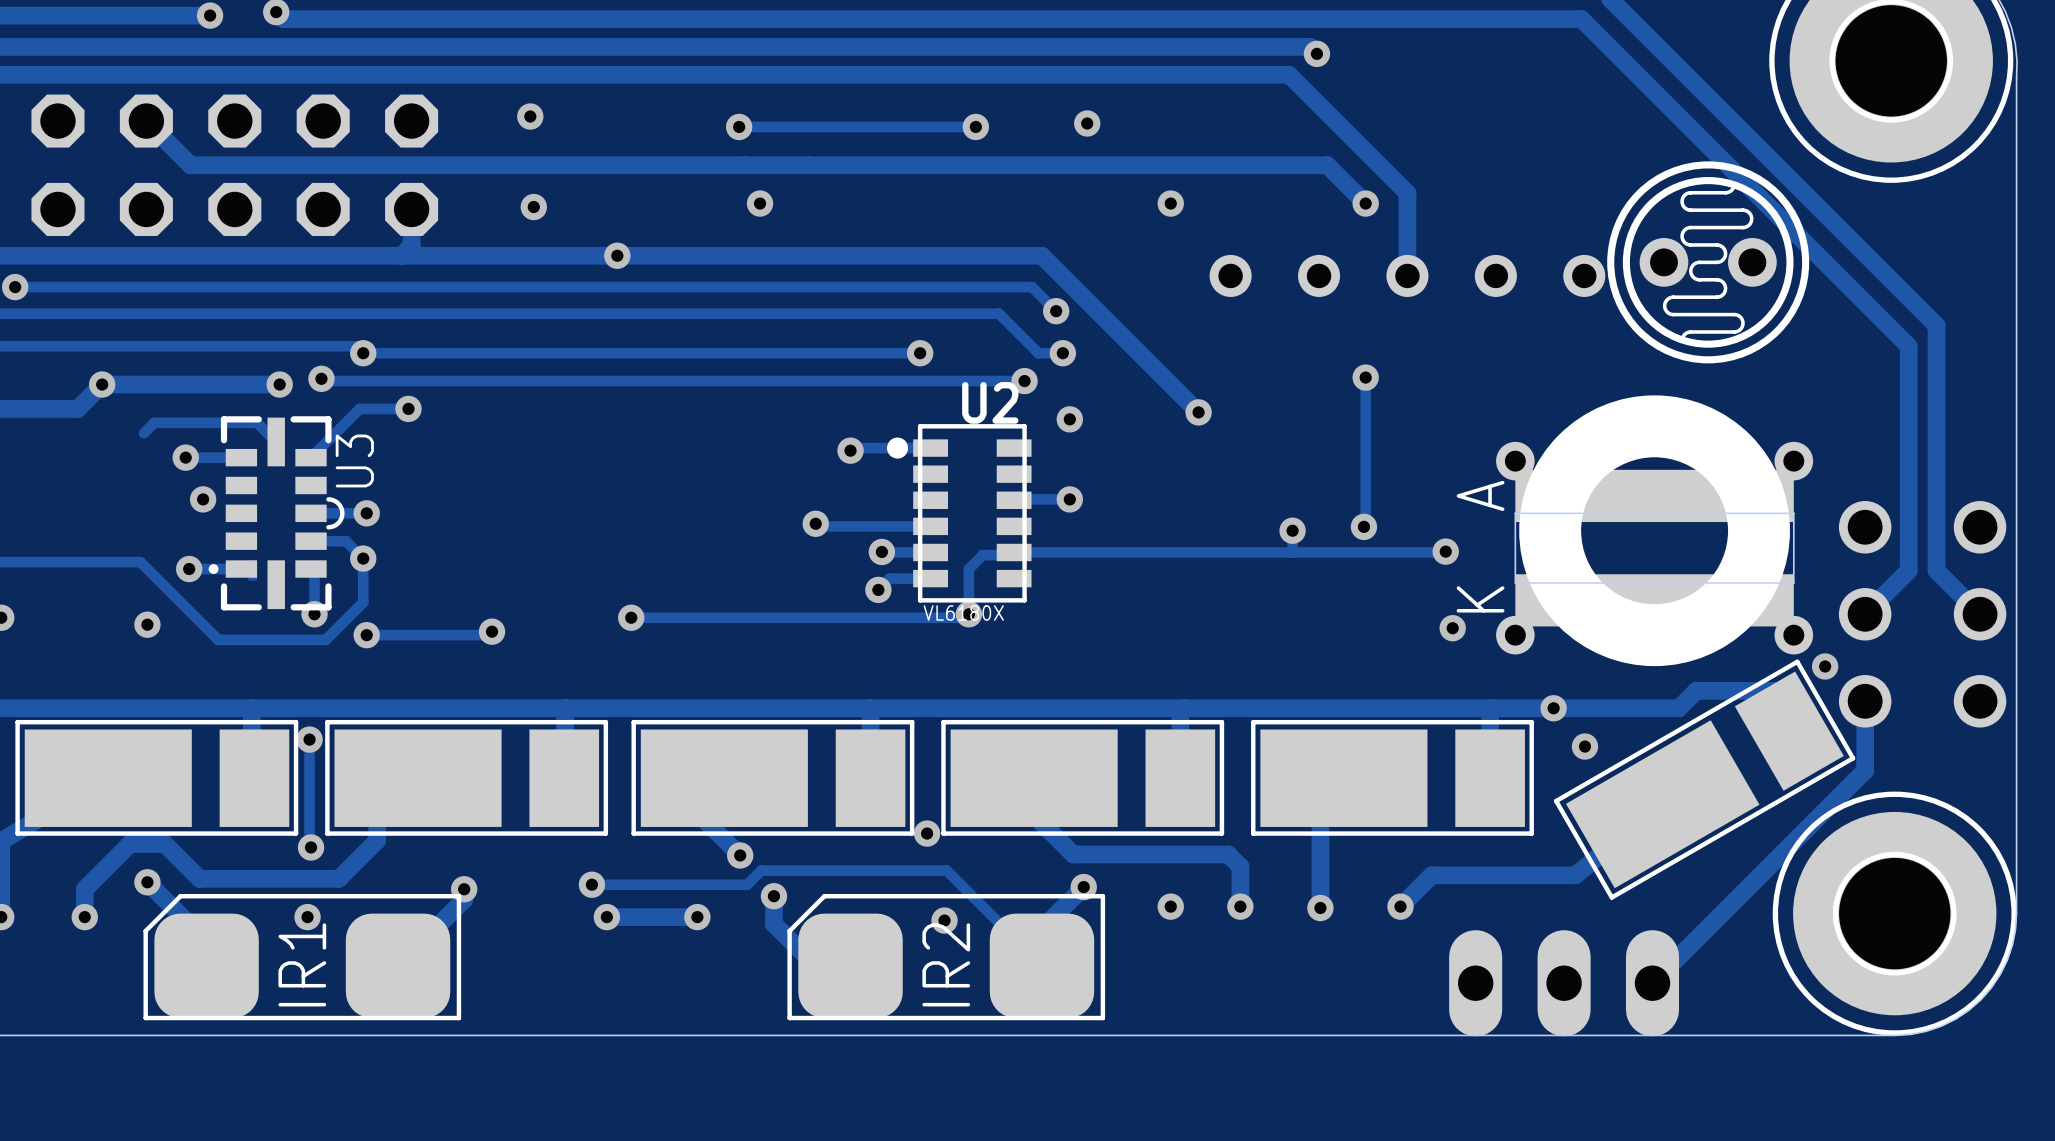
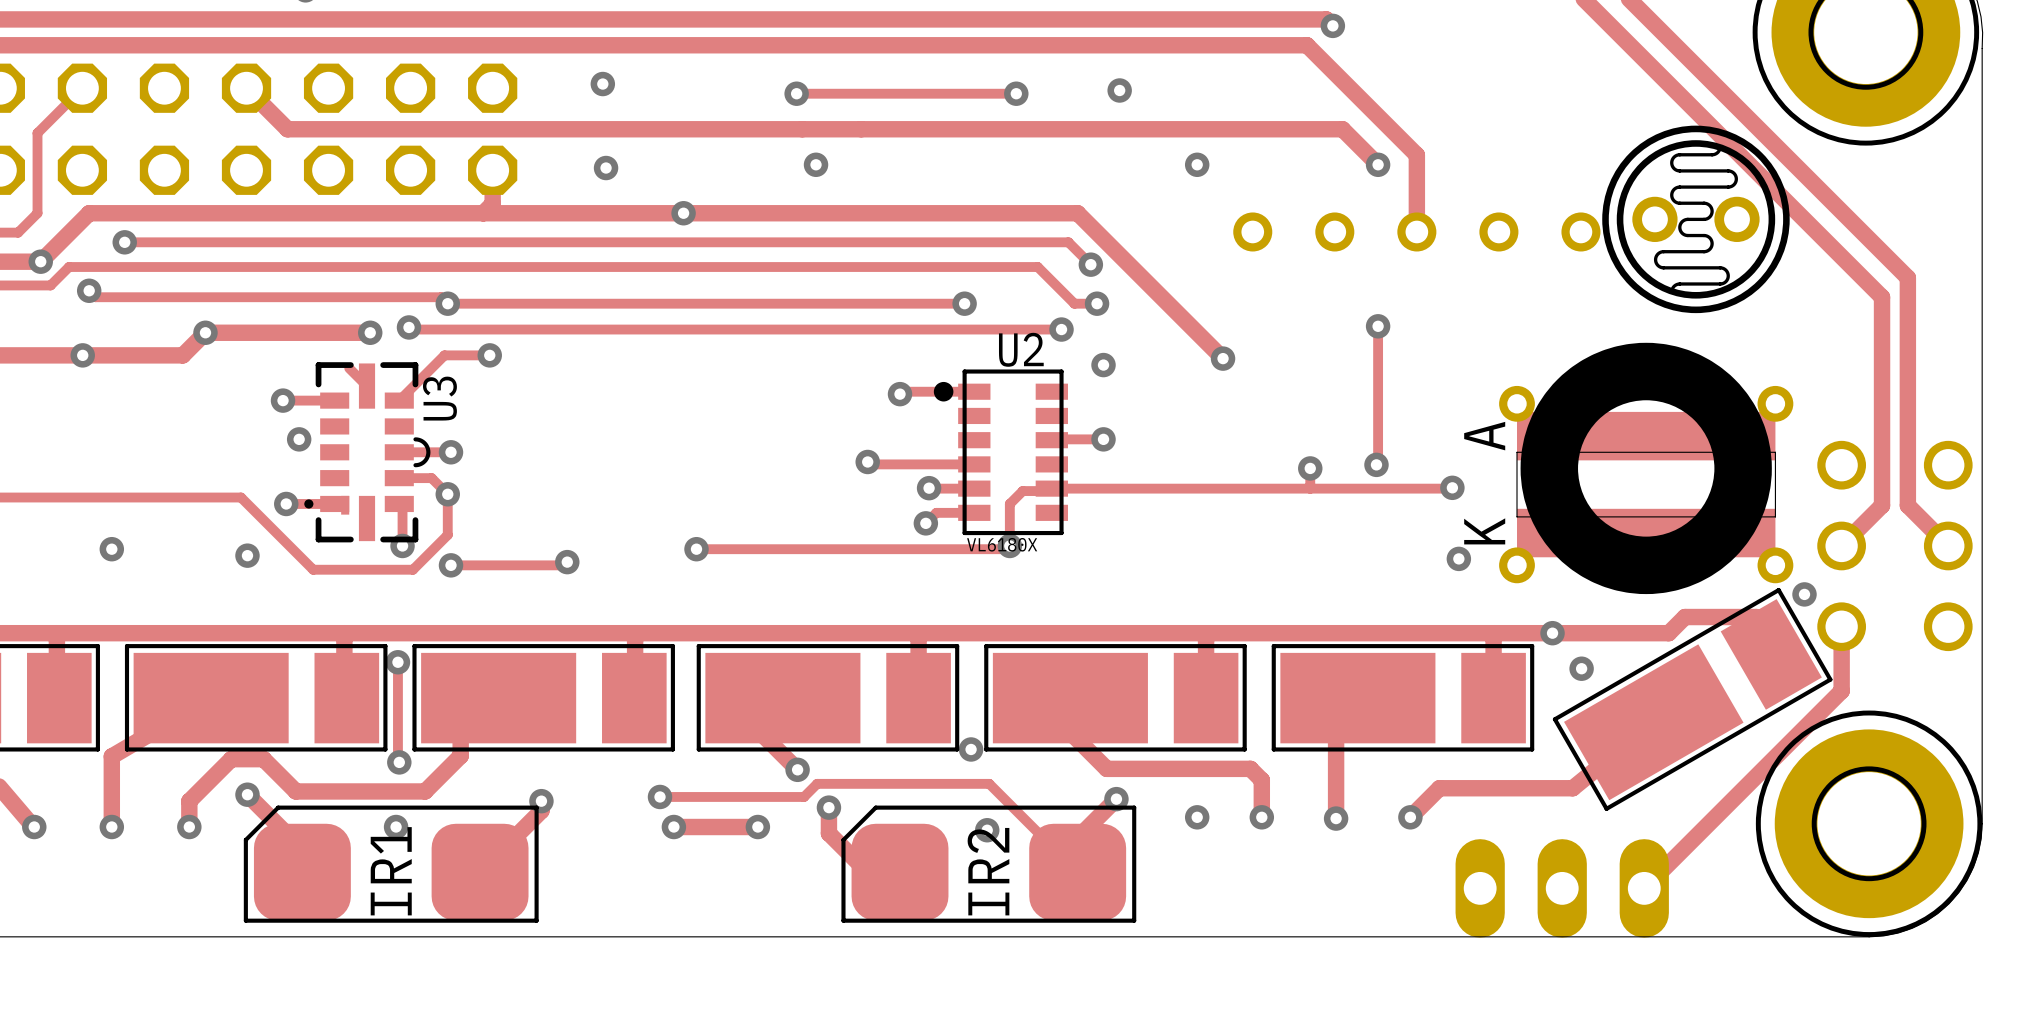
track: (257, 422) (154, 422) (143, 433) -> none

